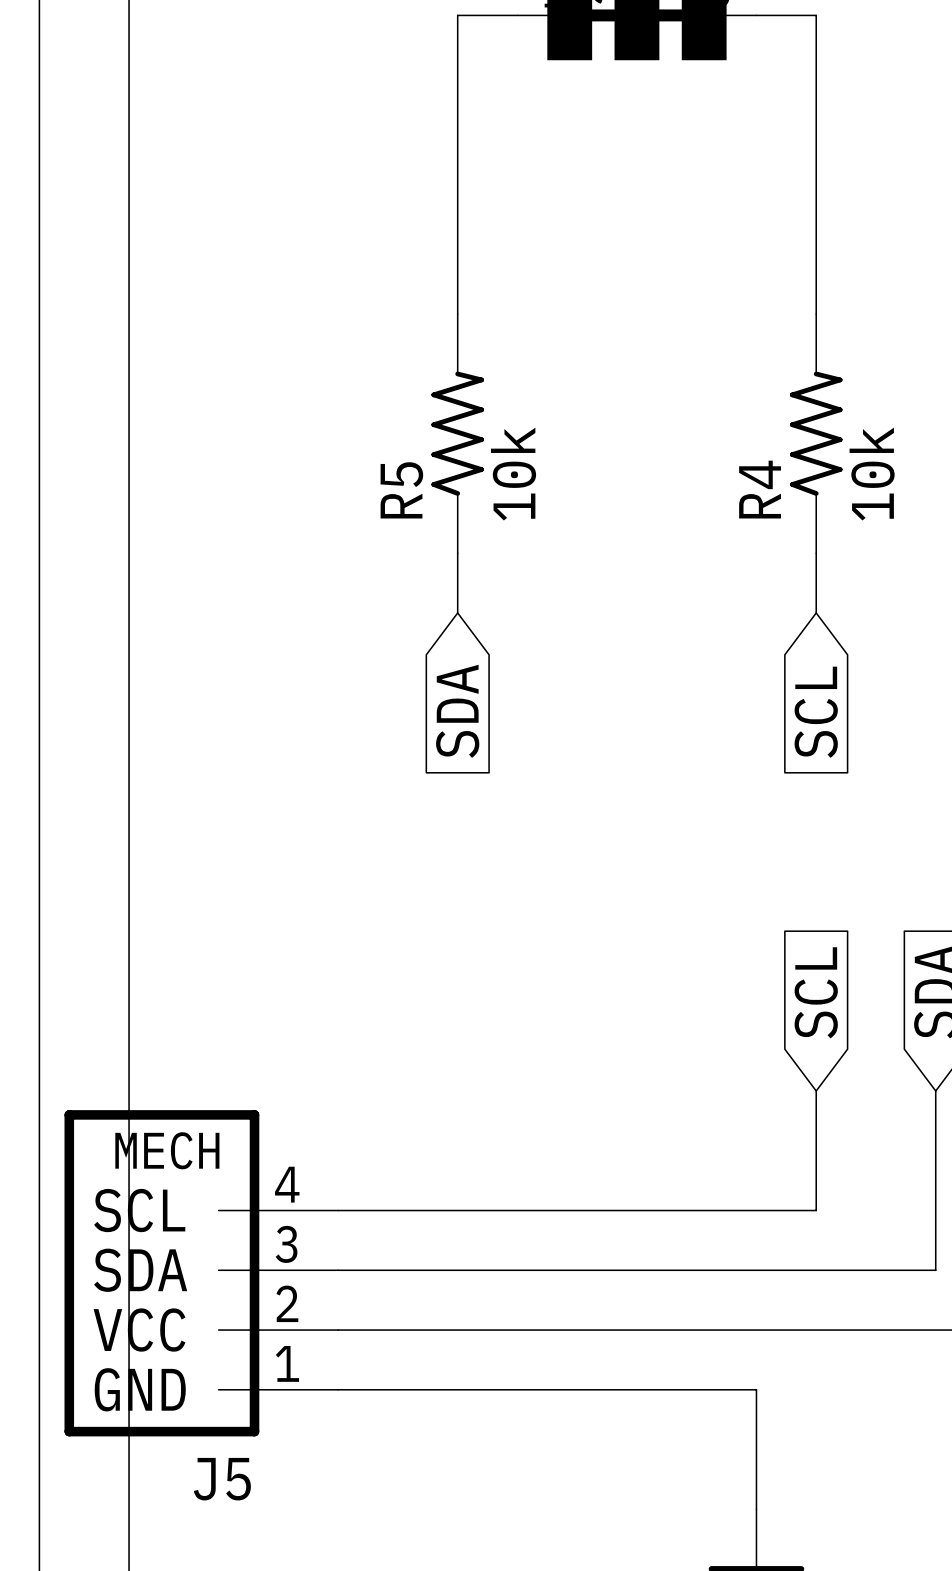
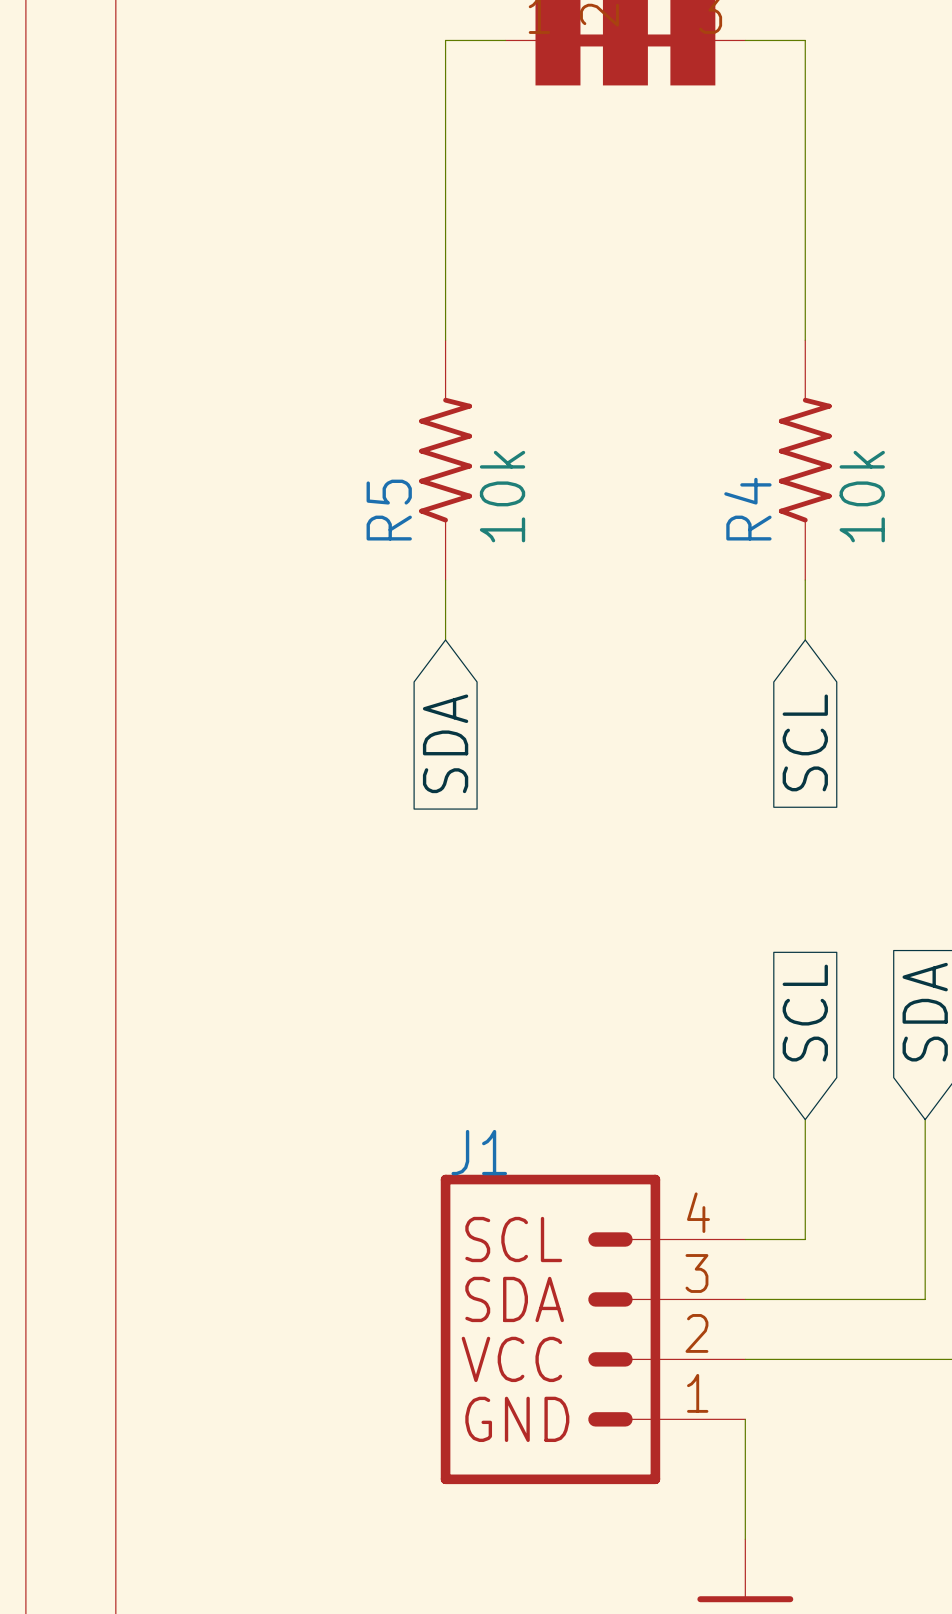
wire: (338, 1210) (756, 1210) -> none
wire: (338, 1270) (756, 1270) -> none
J5: (201, 1273) -> none
J1: none -> (593, 1329)
wire: (338, 1330) (756, 1330) -> none
wire: (338, 1389) (756, 1389) -> none

